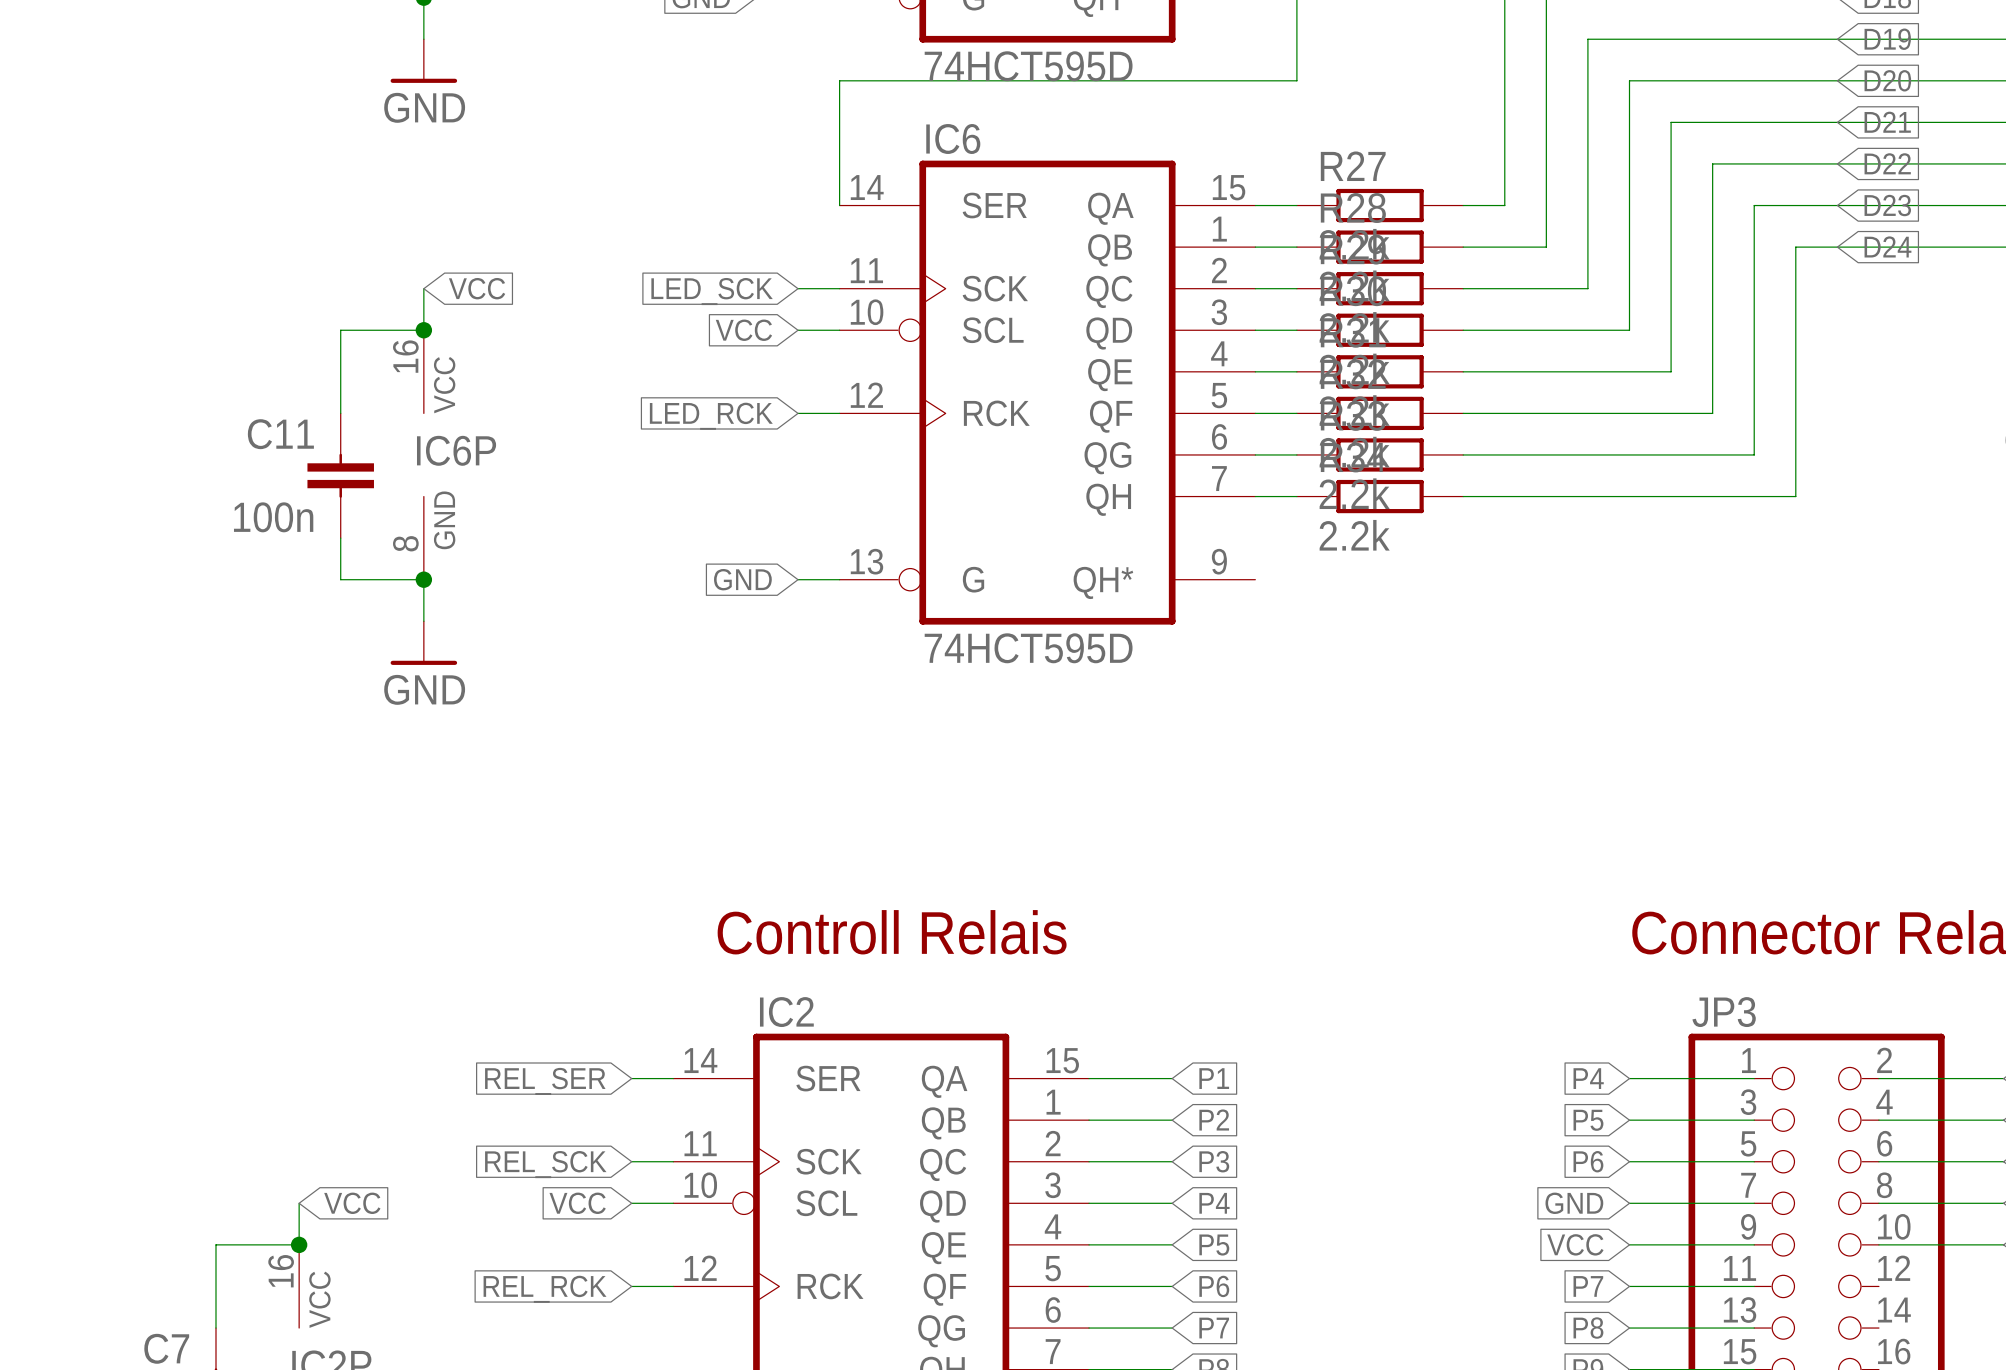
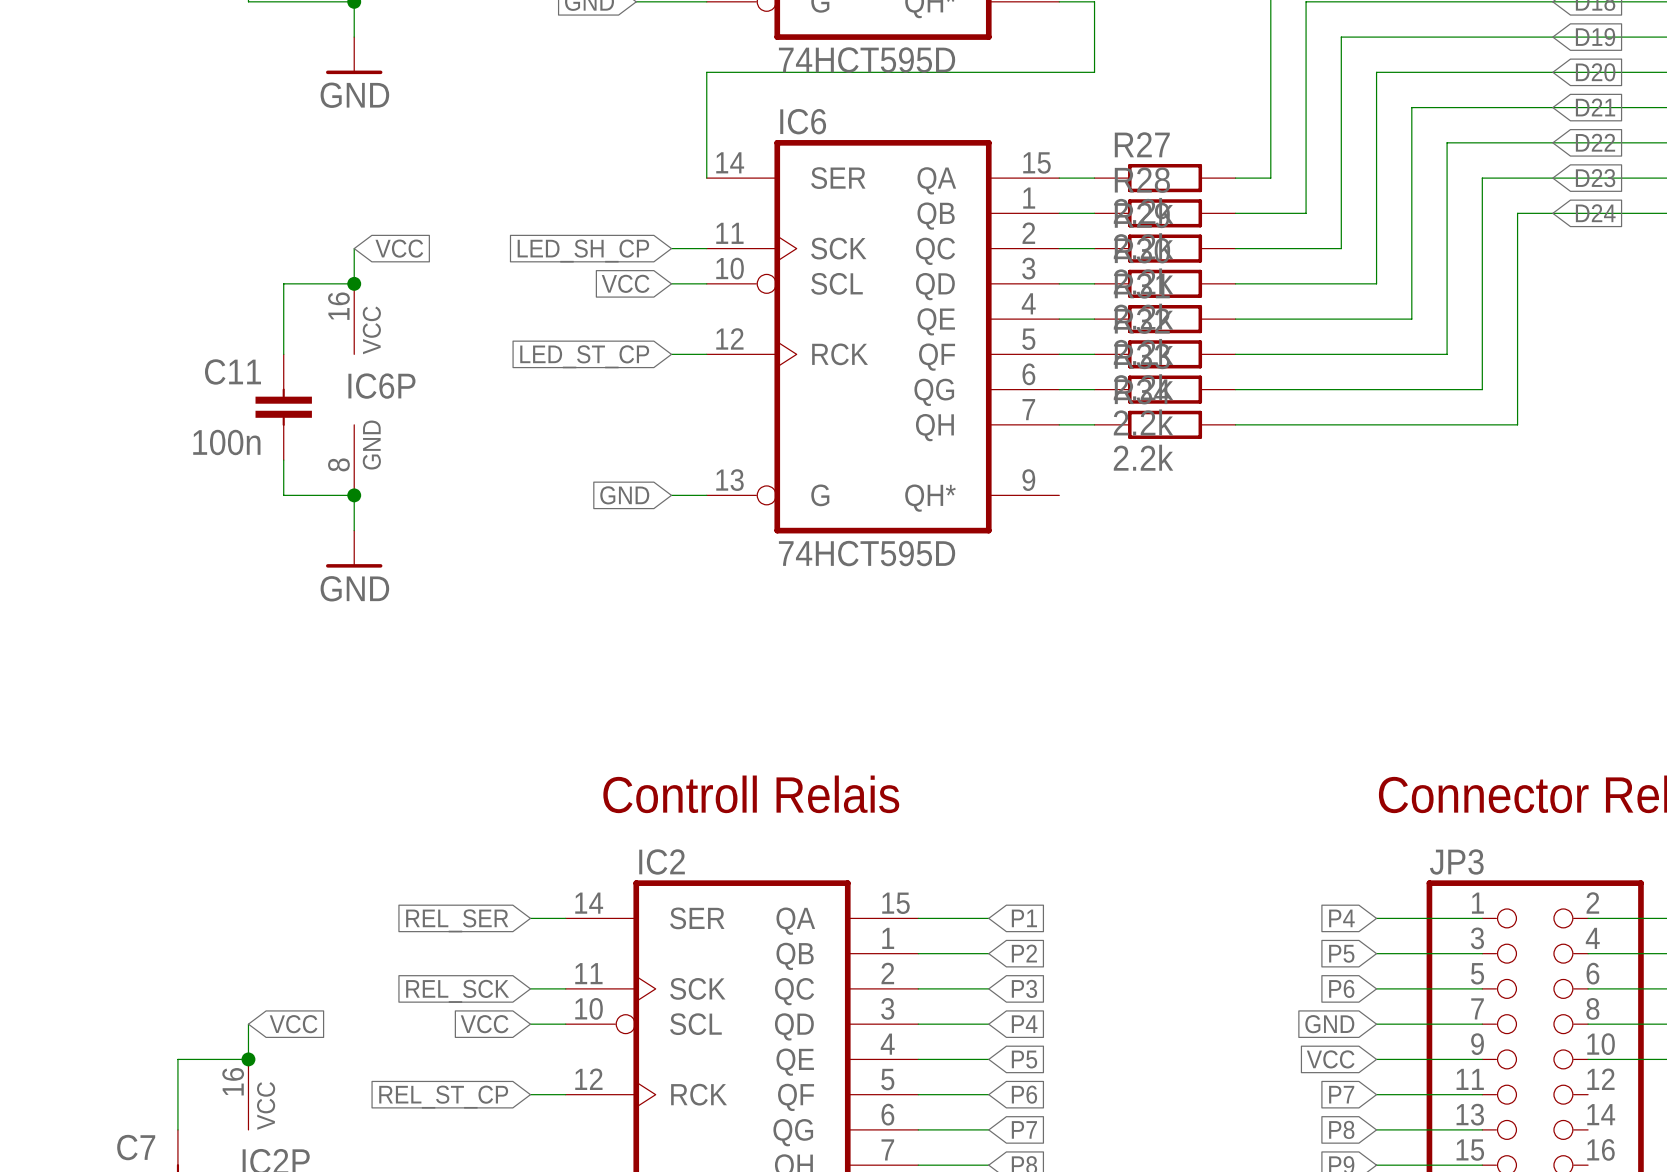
global label: LED_SCK (712, 291) -> LED_SH_CP (583, 251)
global label: LED_RCK (711, 416) -> LED_ST_CP (584, 356)
global label: REL_RCK (545, 1289) -> REL_ST_CP (443, 1097)

